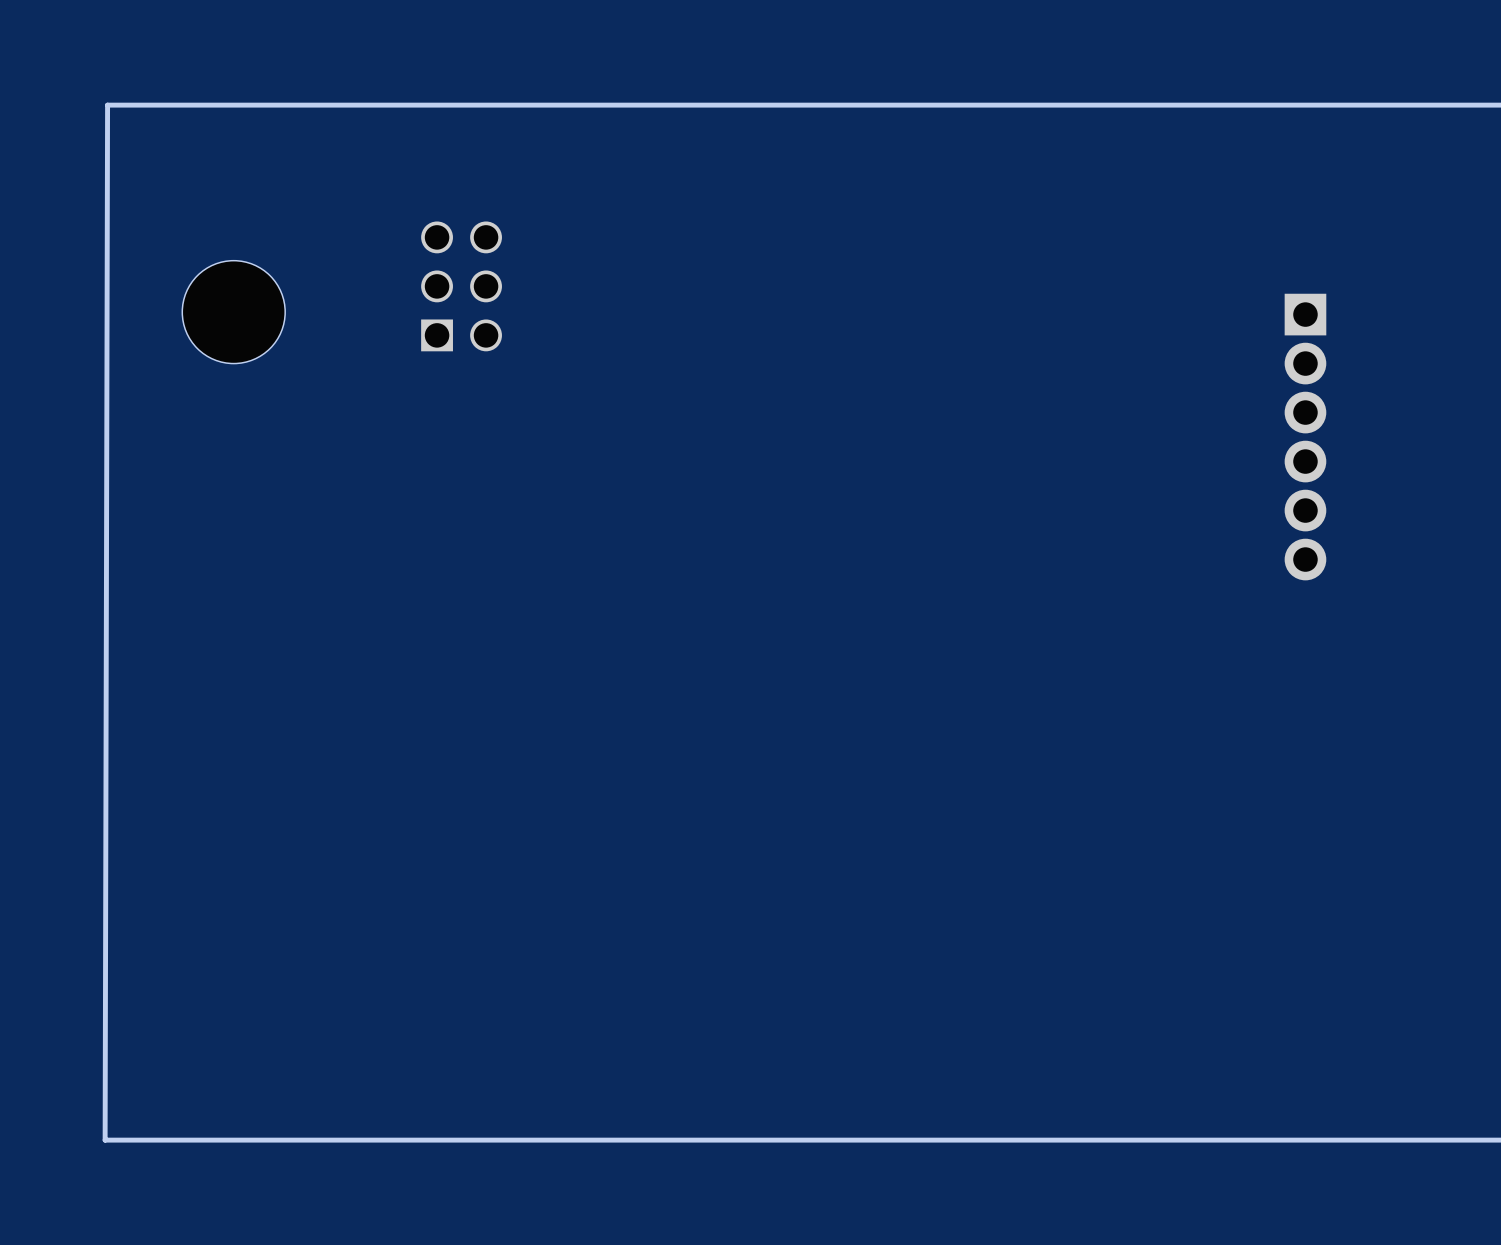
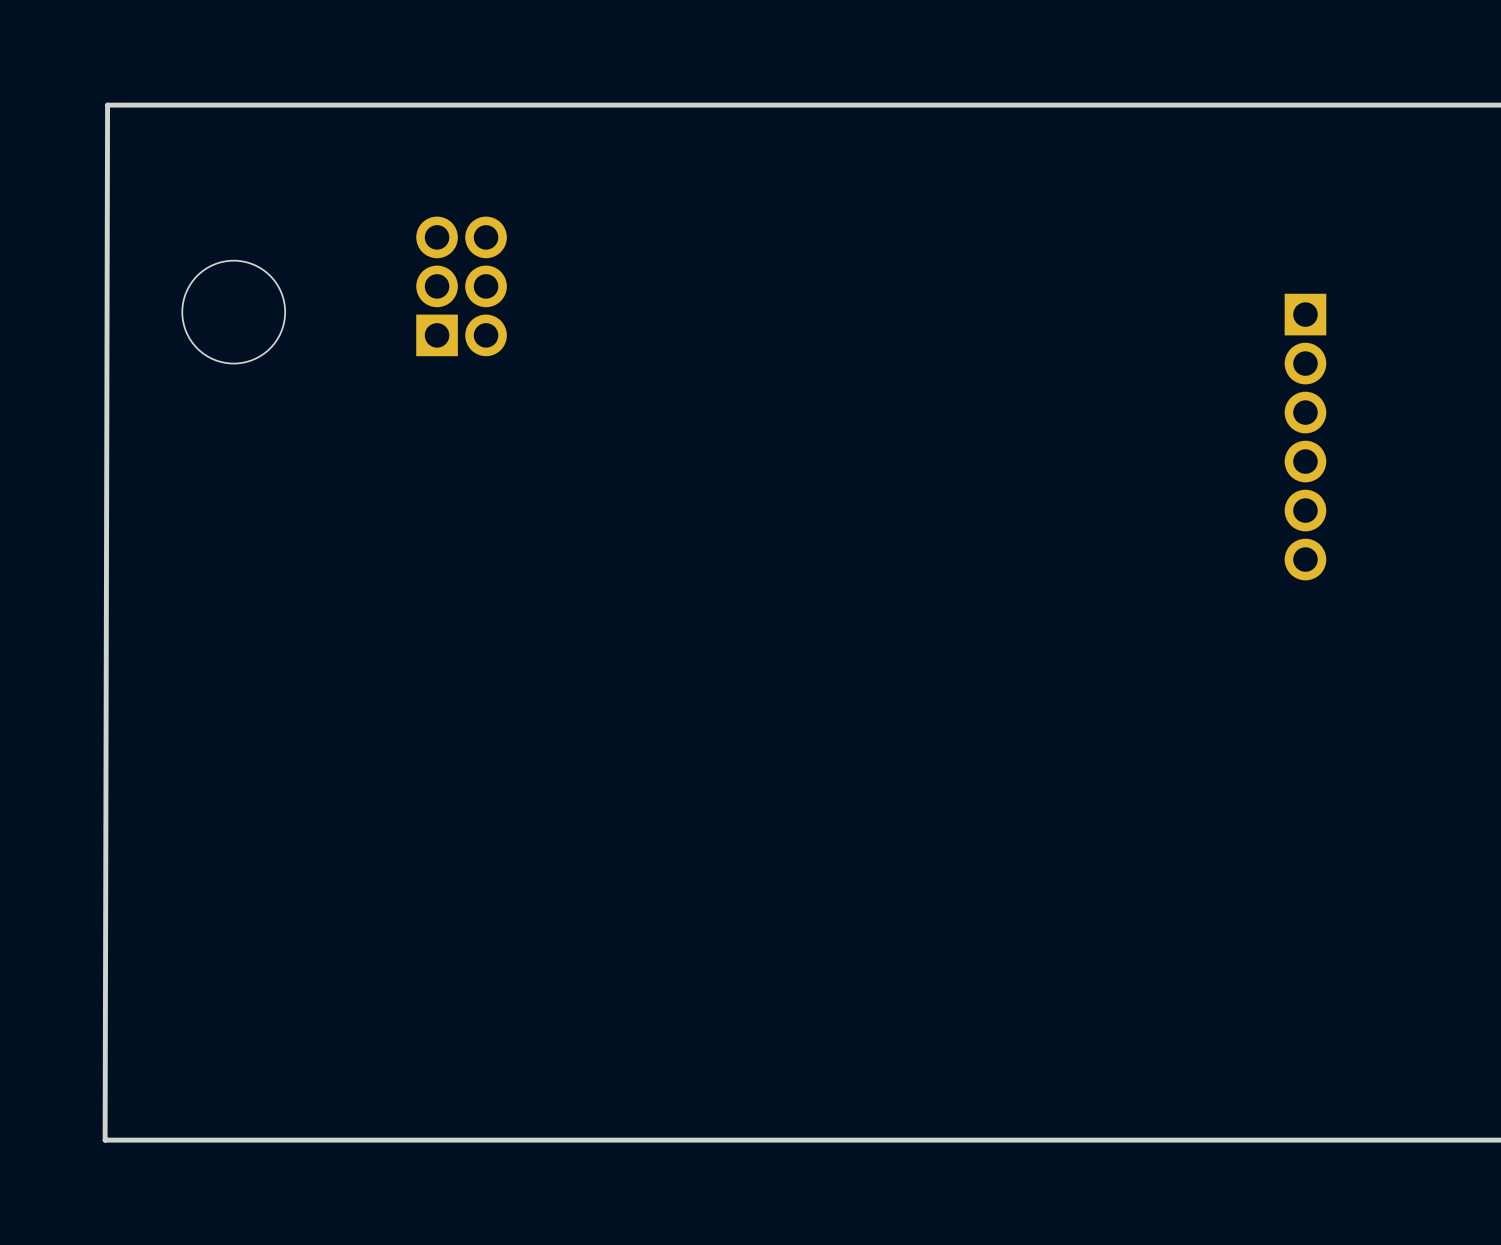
part footprint: [421, 221, 502, 352] -> [416, 216, 507, 357]

